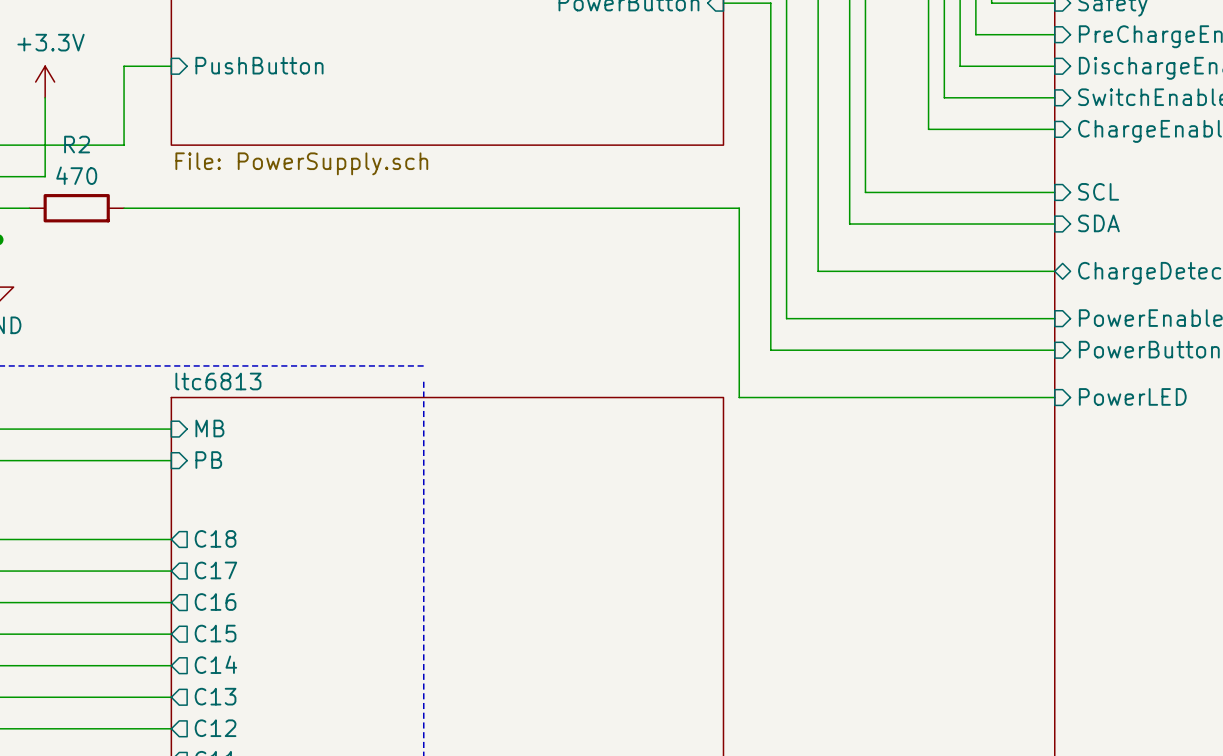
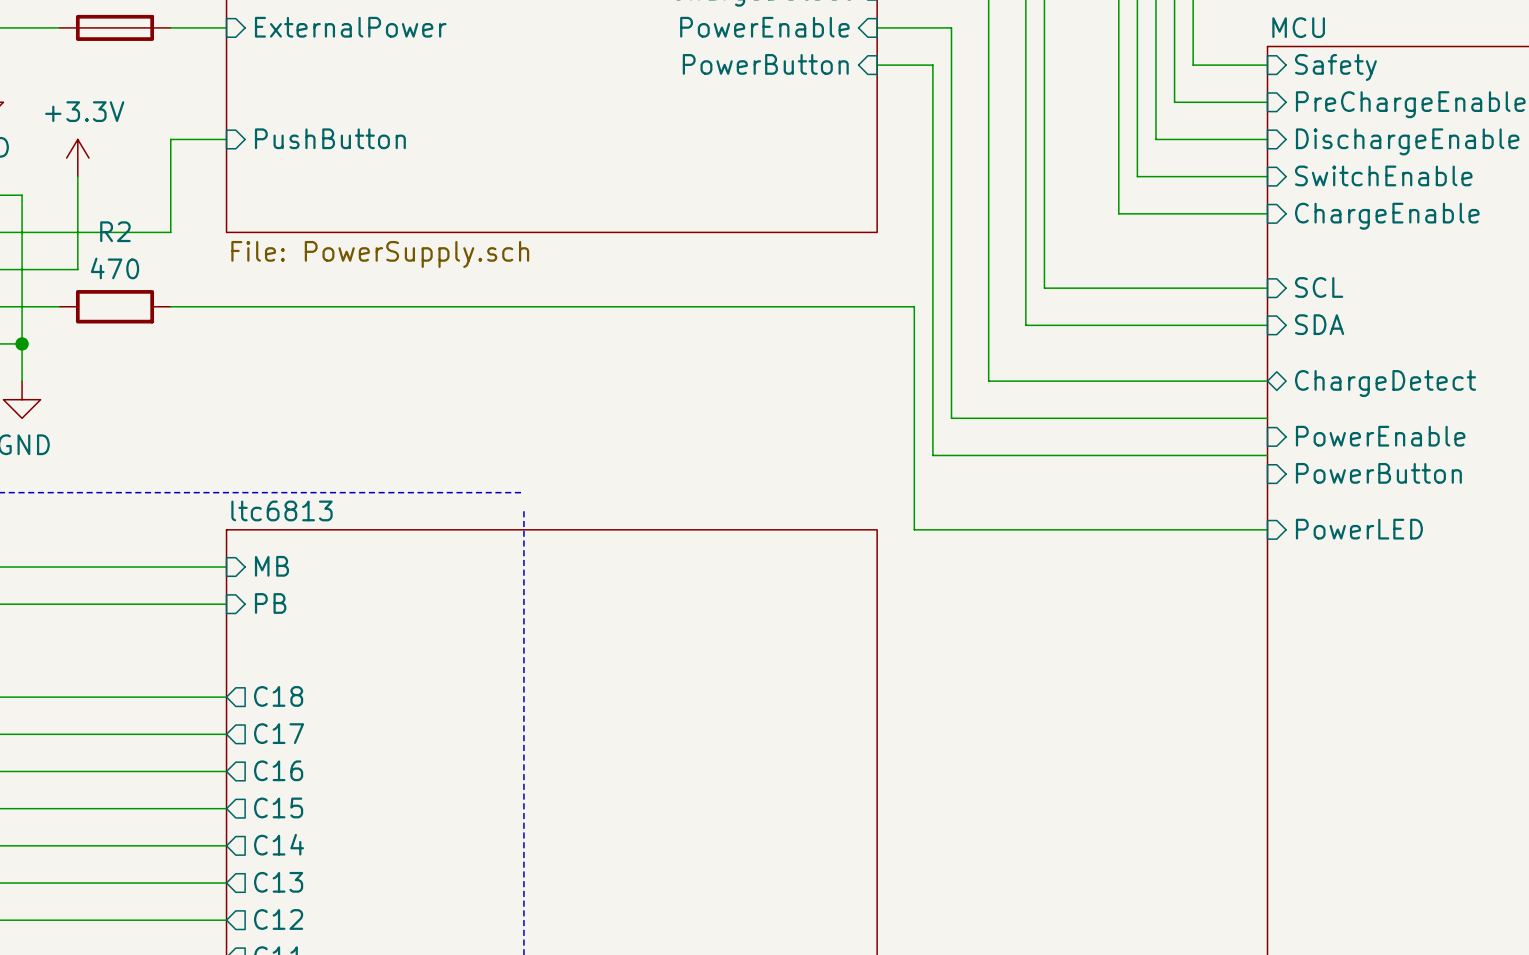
wire: (739, 208) (739, 397) (755, 397) -> (895, 306) (914, 306) (914, 529)
wire: (786, 302) (786, 318) (1054, 318) -> (951, 418) (1267, 418)
wire: (770, 334) (770, 350) (1054, 350) -> (932, 455) (1267, 455)

